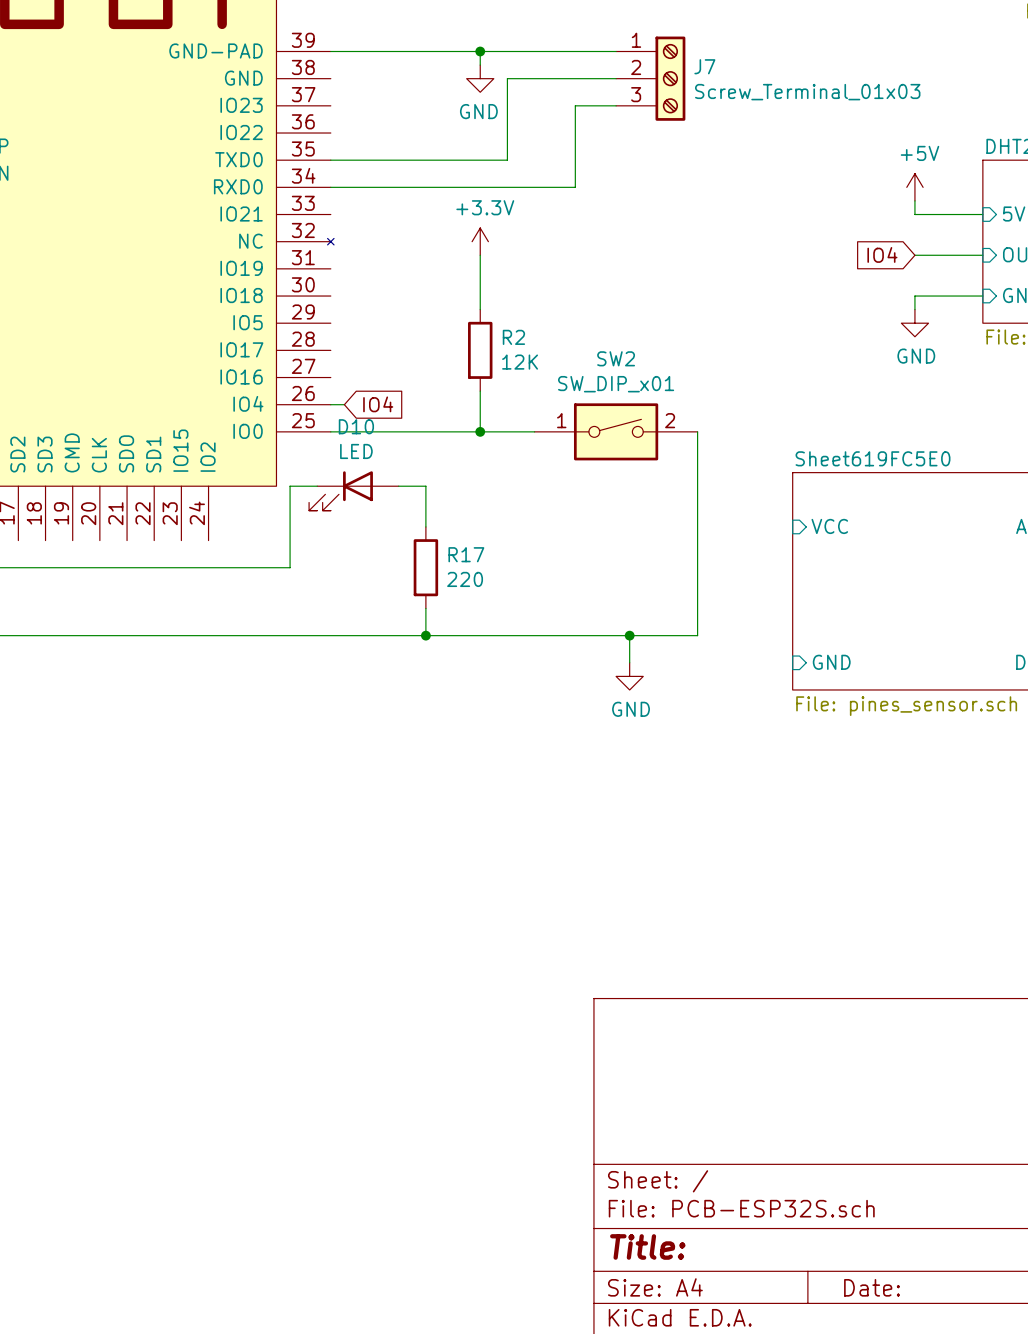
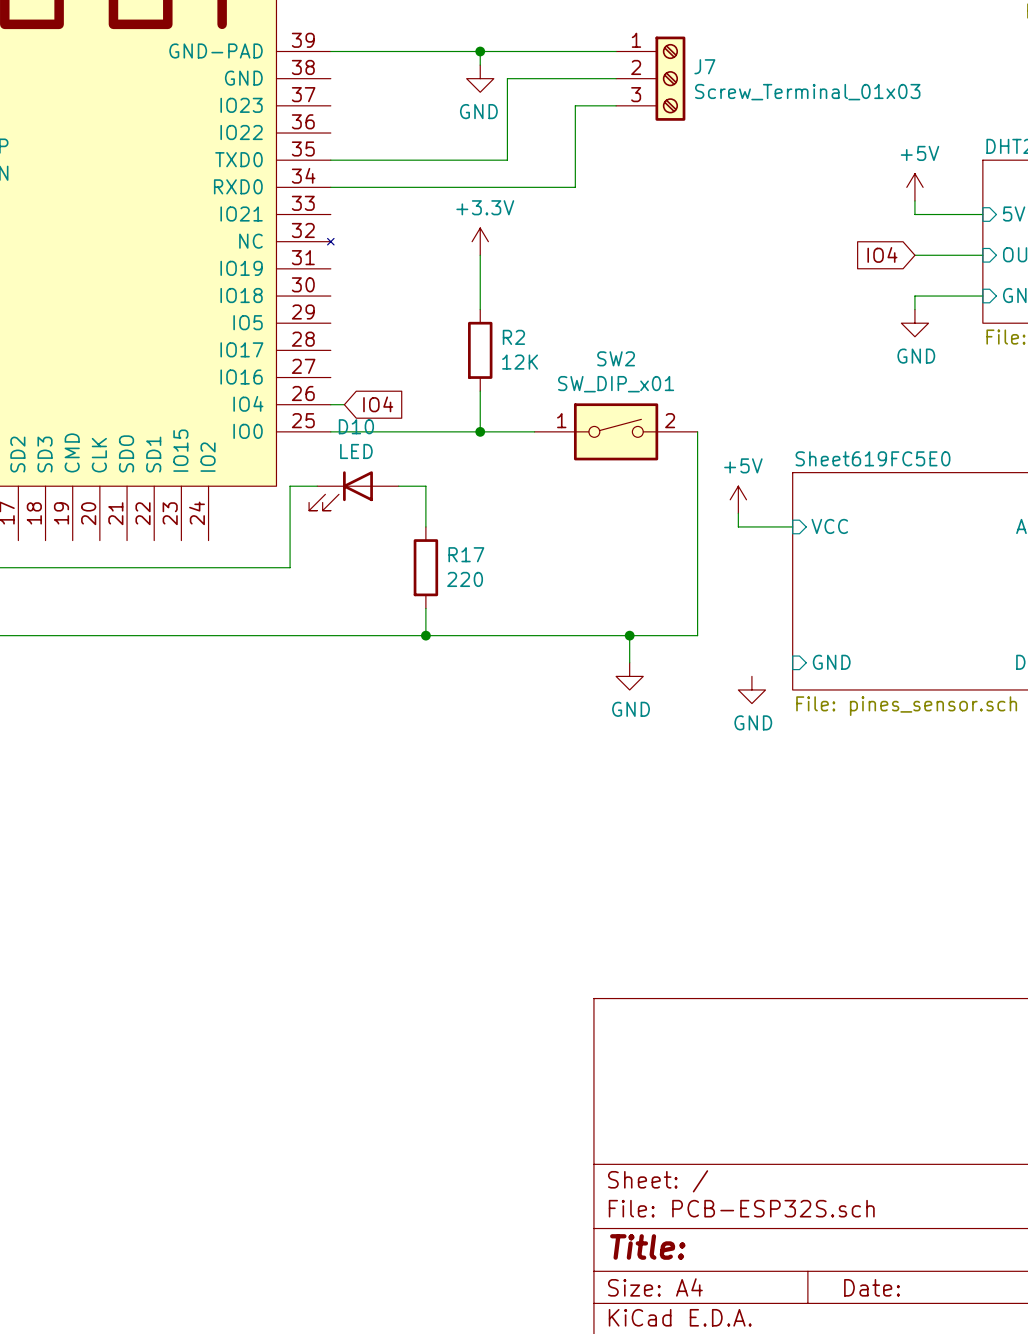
power symbol: none -> +5V (738, 499)
wire: none -> (738, 513) (738, 526) (792, 526)
power symbol: none -> GND (751, 689)

